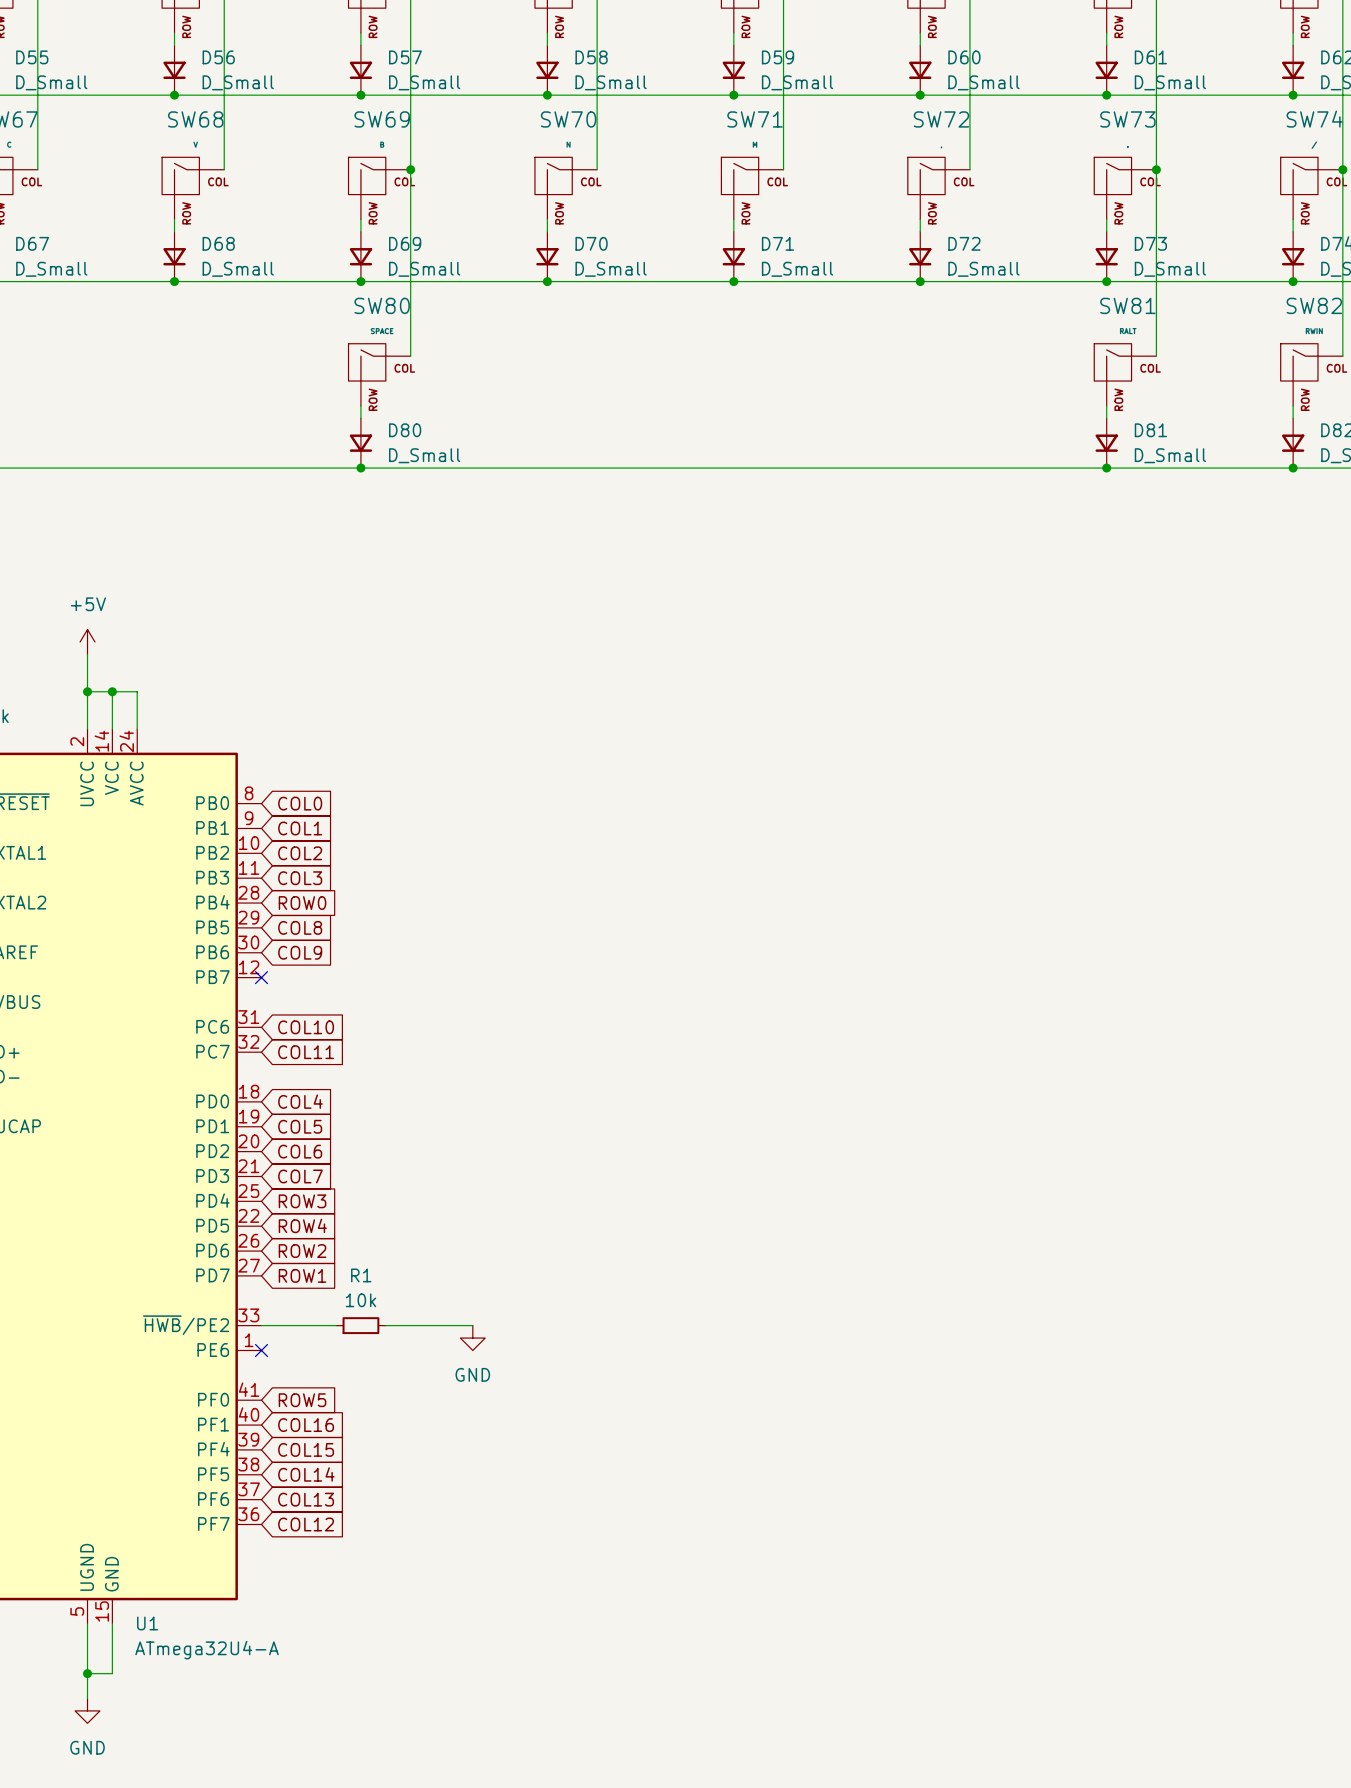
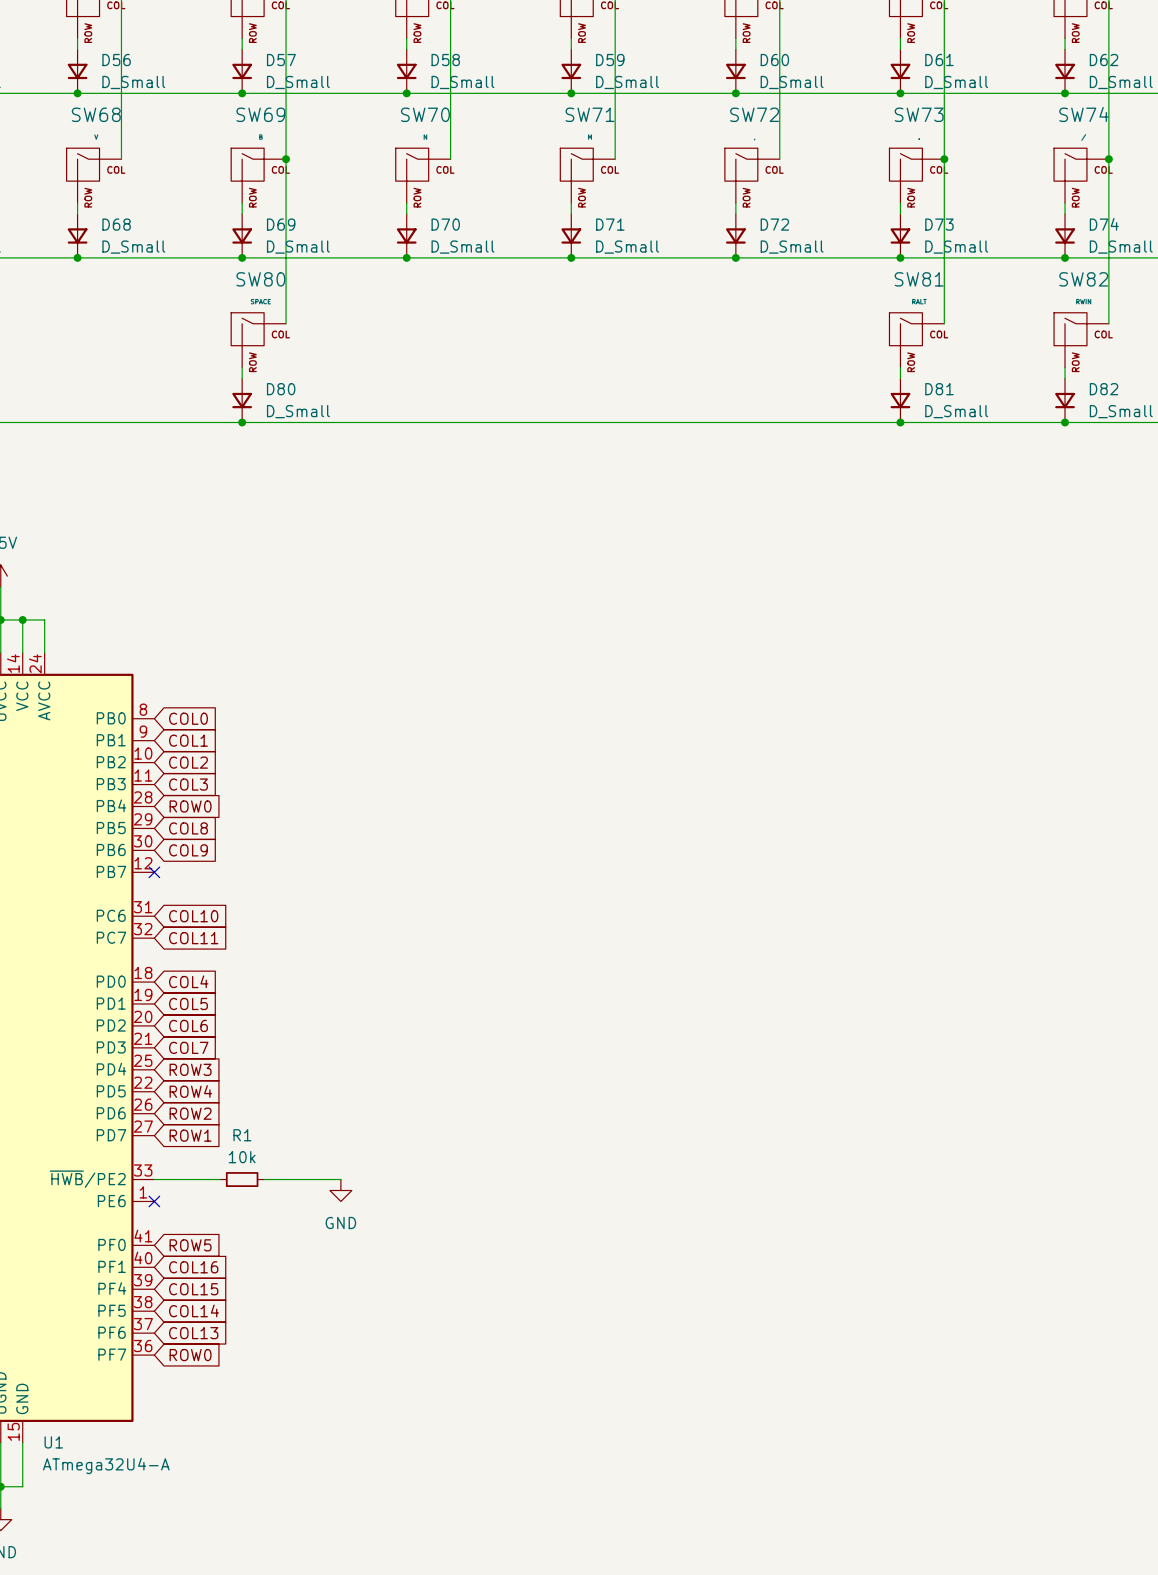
global label: COL12 (306, 1524) -> ROW0 (190, 1355)

